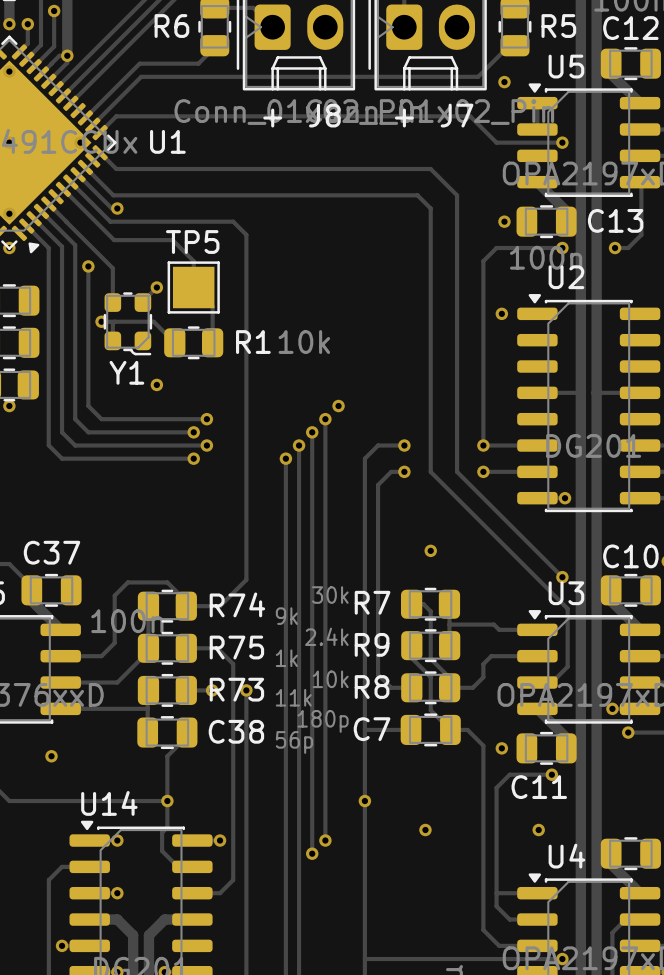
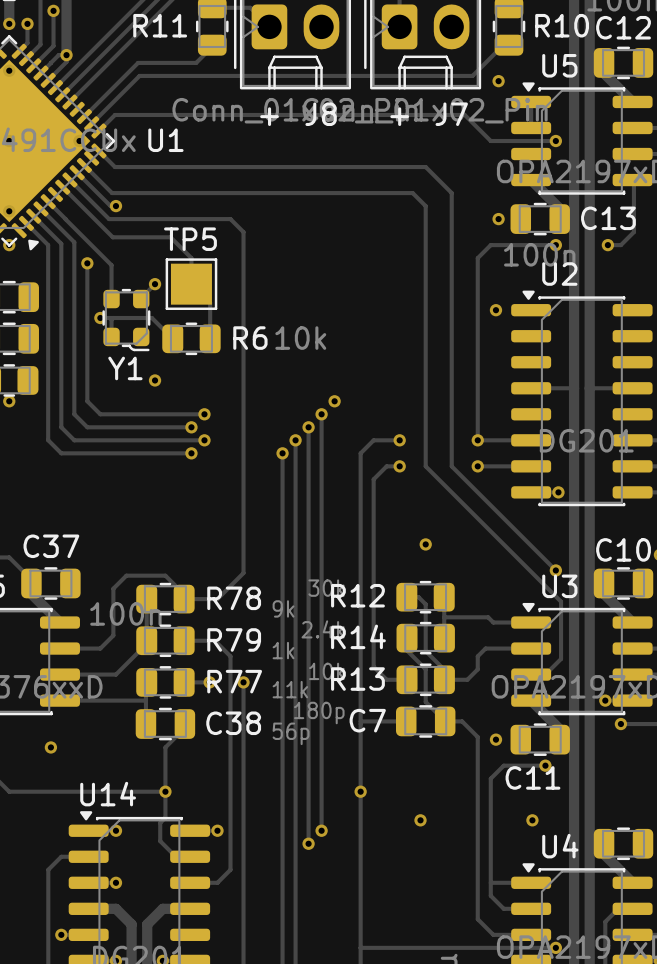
R6 name: R6 (171, 26) -> R11 (160, 25)
R5 name: R5 (558, 26) -> R10 (562, 25)
R1 name: R1 (253, 342) -> R6 (250, 338)
R7 name: R7 (372, 602) -> R12 (357, 595)
R74 name: R74 (237, 604) -> R78 (234, 598)
R9 name: R9 (372, 644) -> R14 (358, 636)
R75 name: R75 (236, 647) -> R79 (234, 639)
R8 name: R8 (372, 687) -> R13 (357, 679)
R73 name: R73 (236, 689) -> R77 (234, 681)

